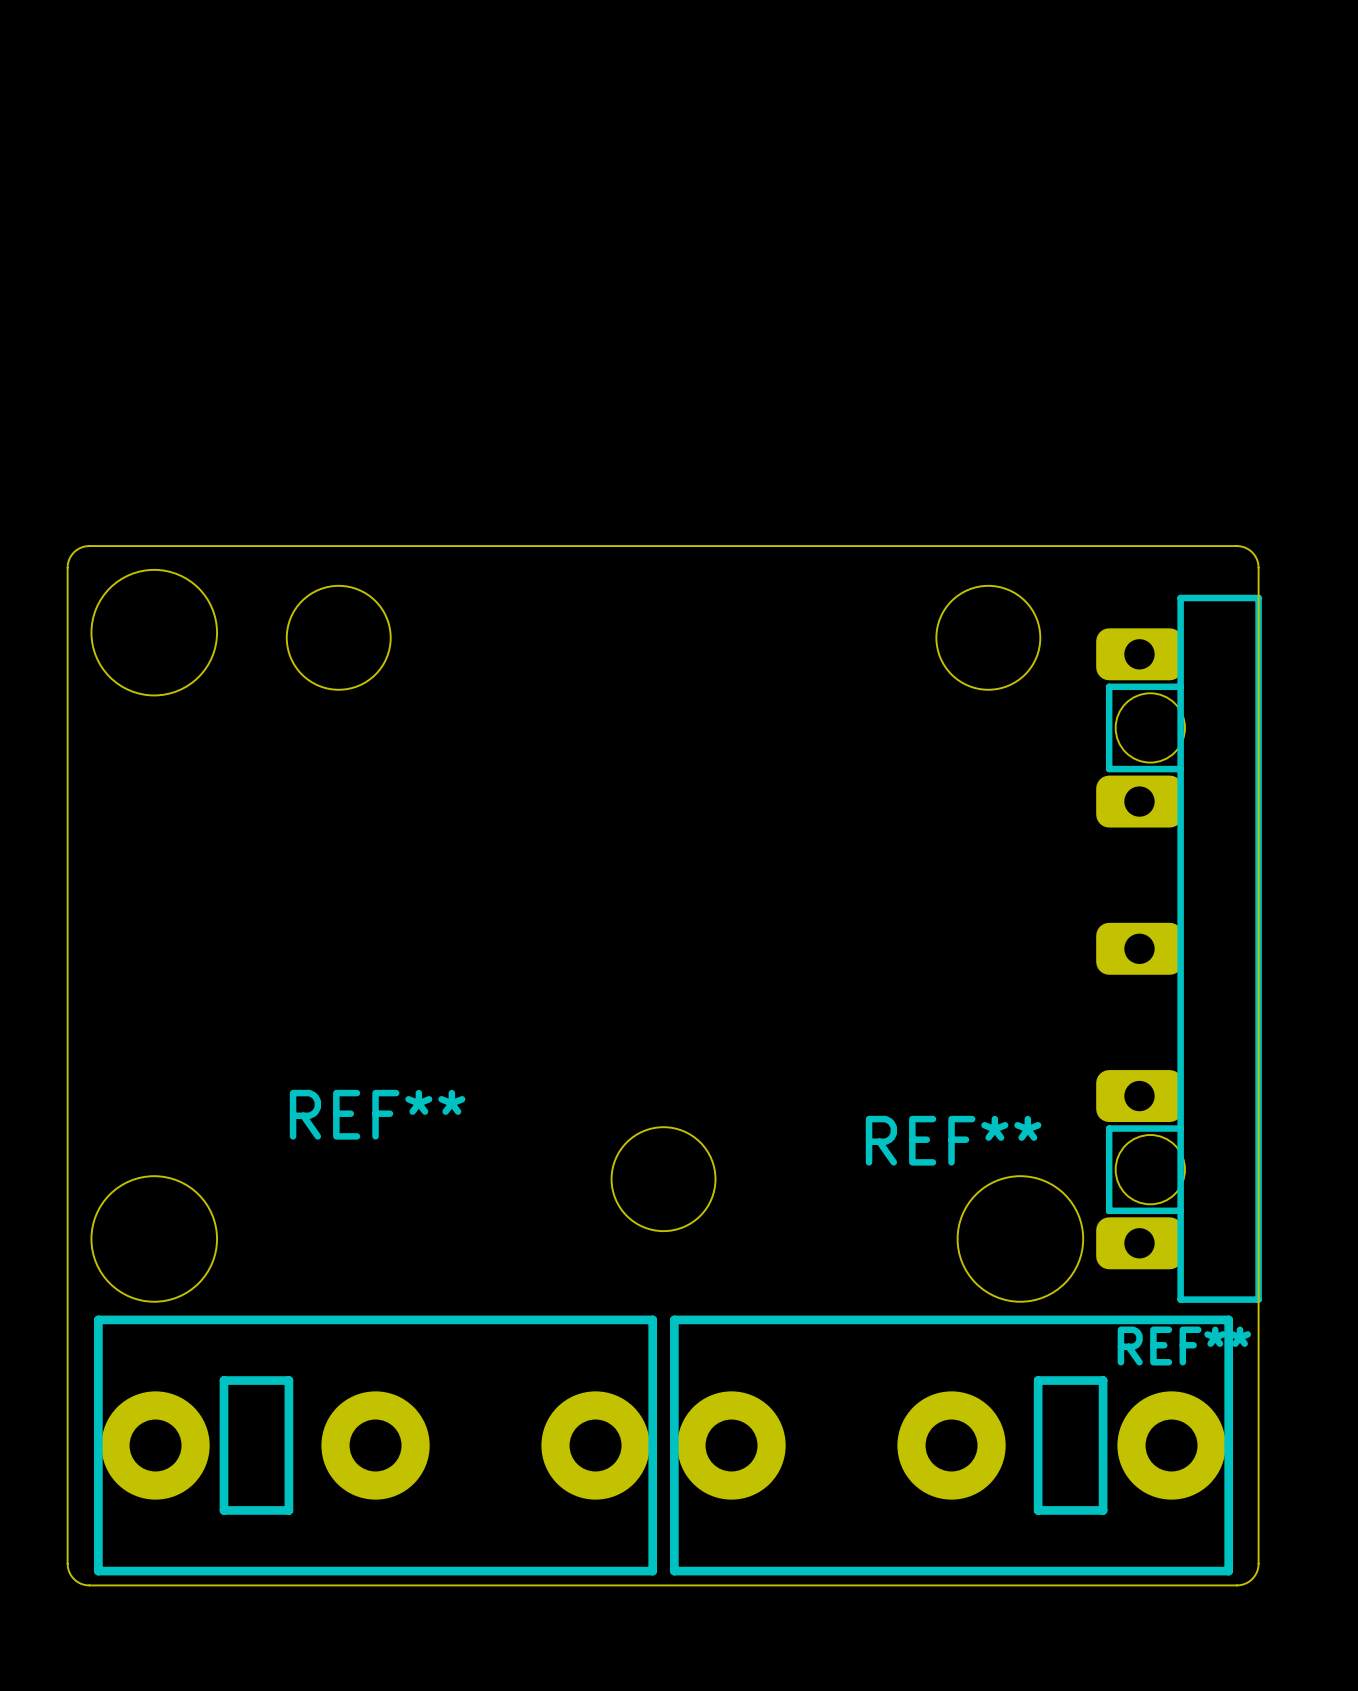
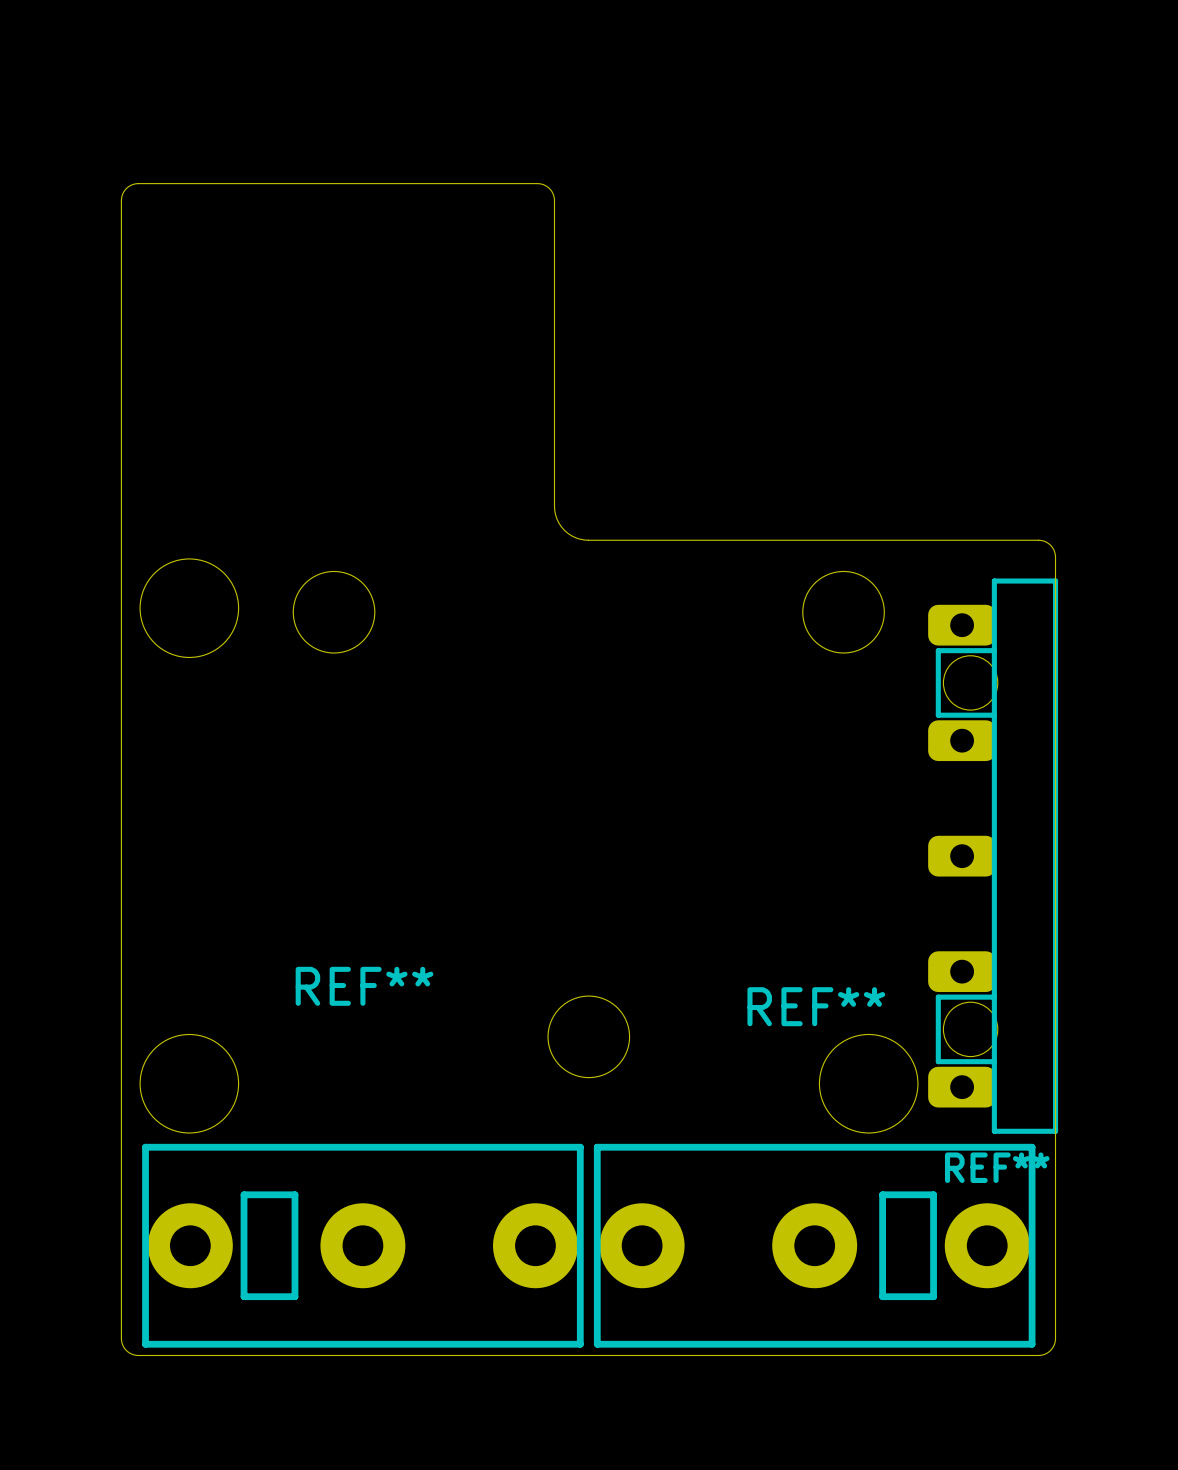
board edge: (663, 546) (89, 546) (82, 547) (73, 552) (69, 558) (67, 567) -> (588, 540) (575, 537) (567, 533) (559, 523) (554, 510) (554, 200) (553, 194) (547, 187) (537, 183) (138, 183) (126, 188) (121, 200) (121, 557)

